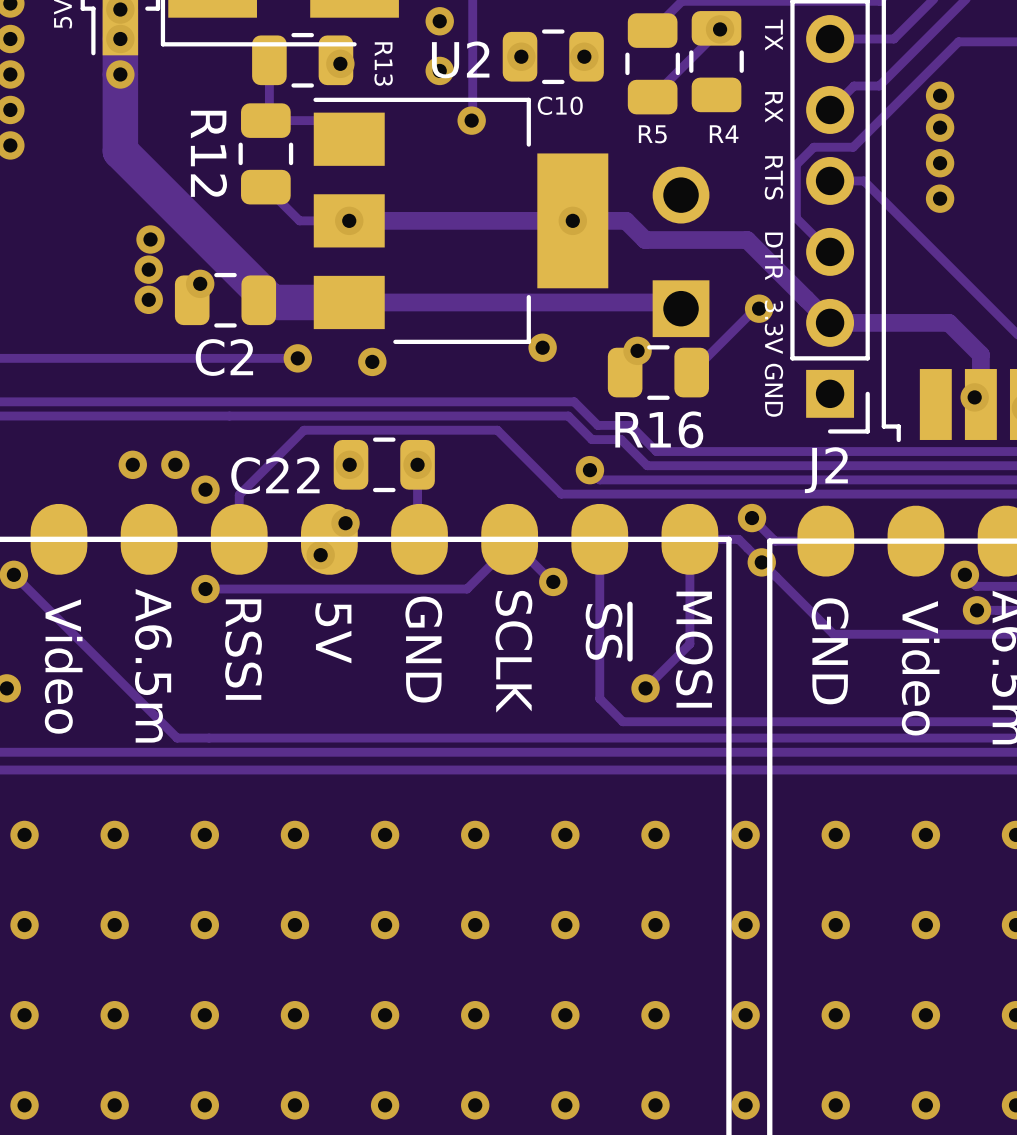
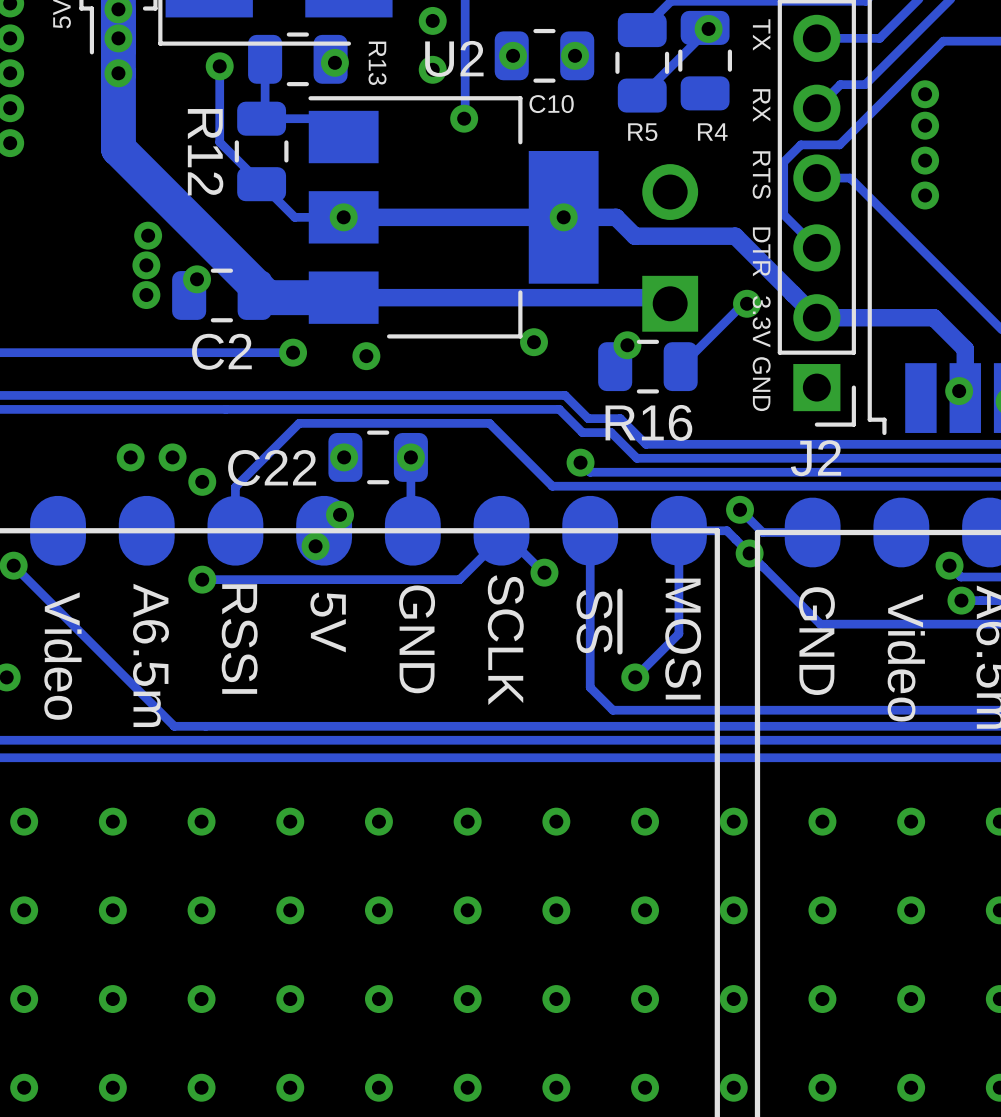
track: none -> (219, 66) (219, 142) (261, 184)
via: none -> (219, 66)

